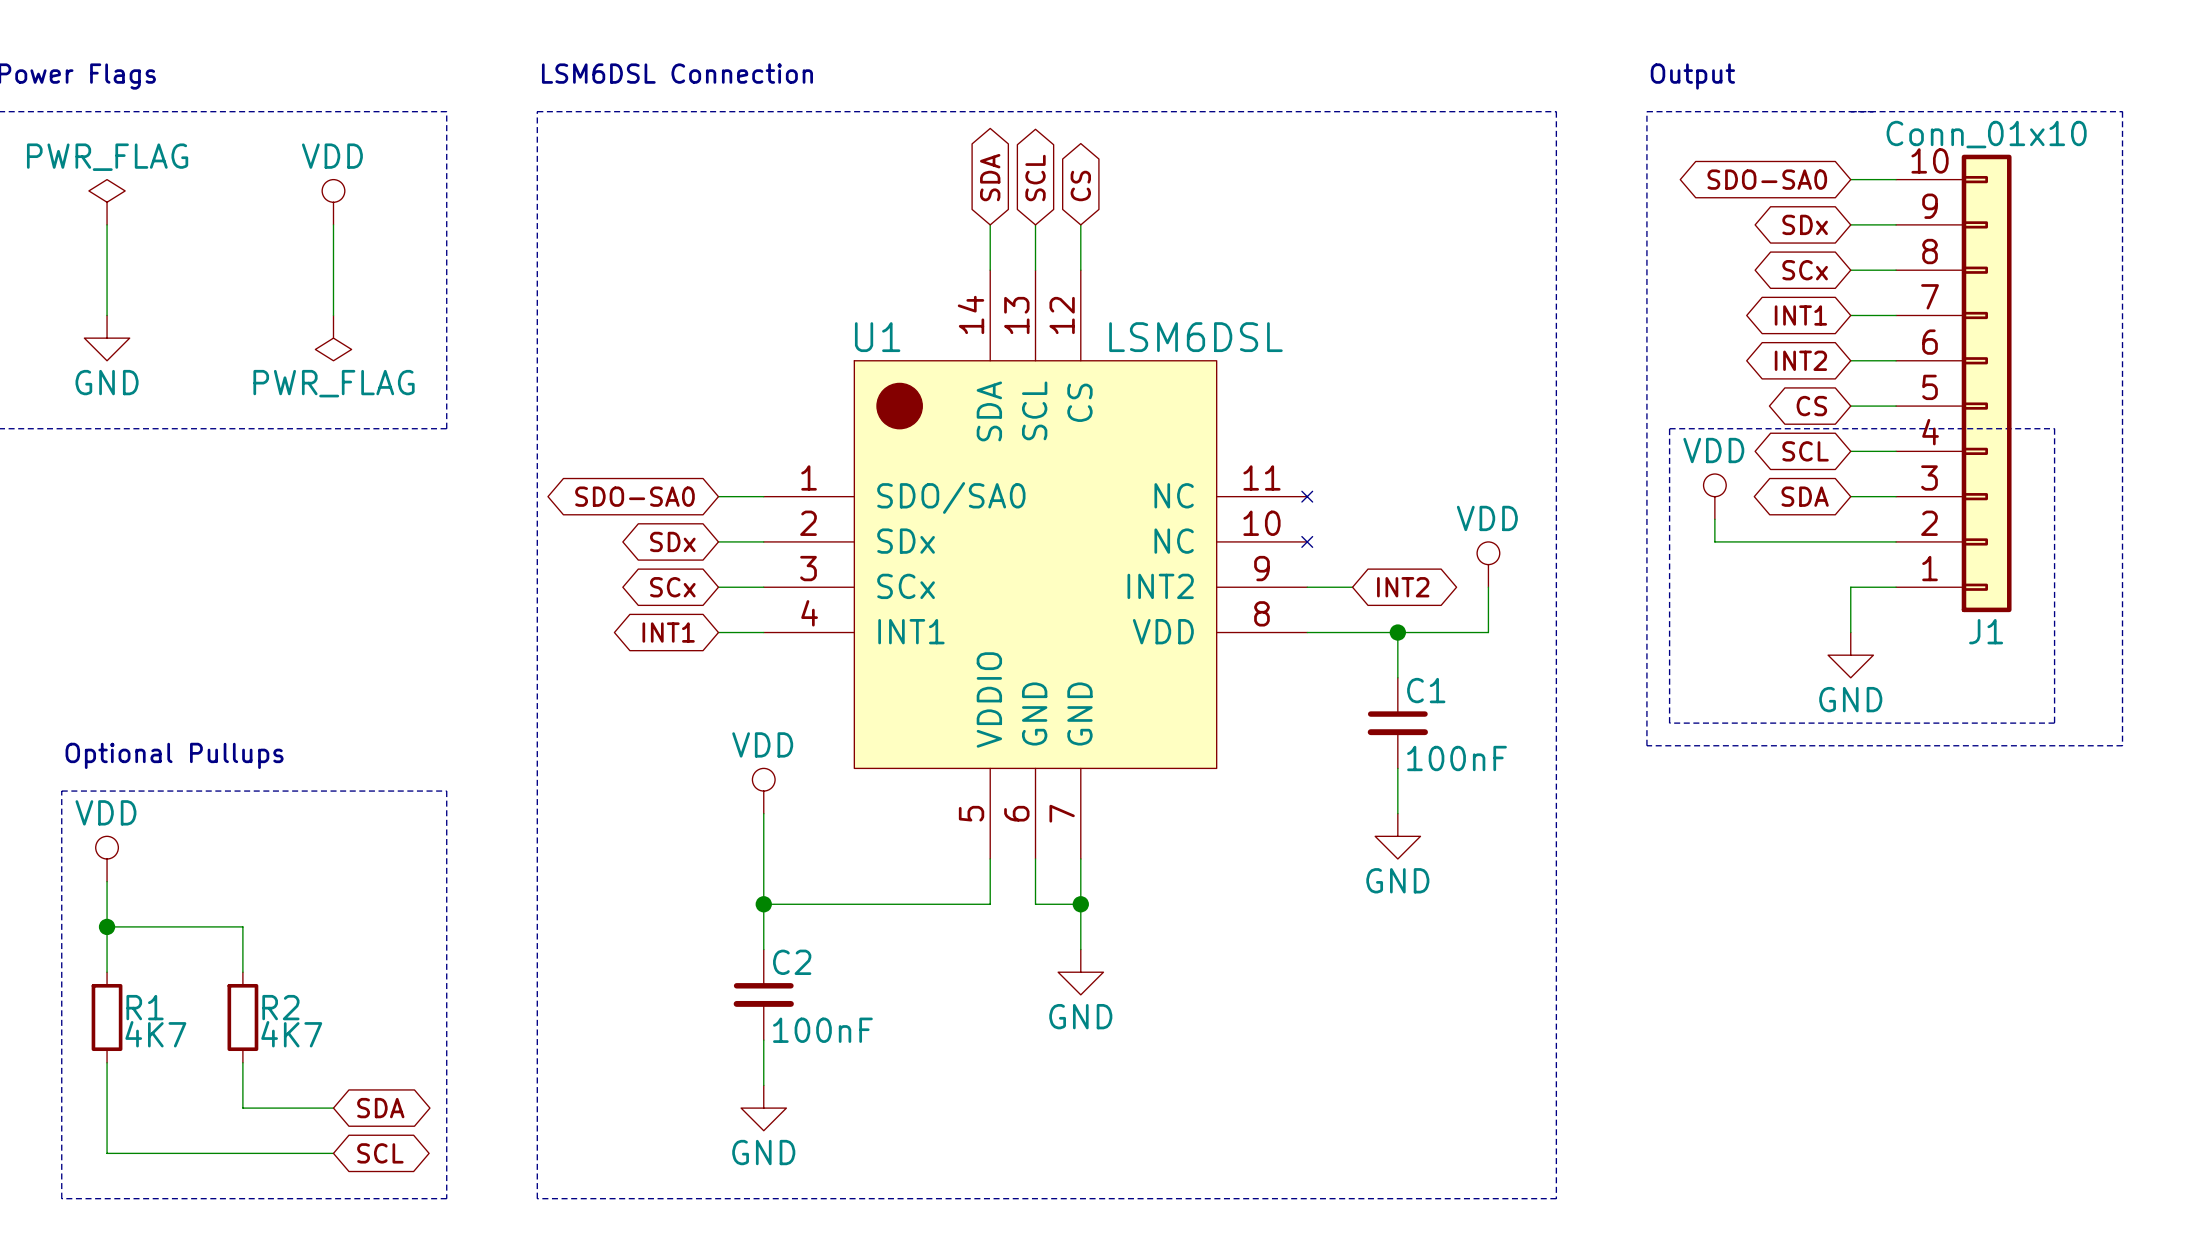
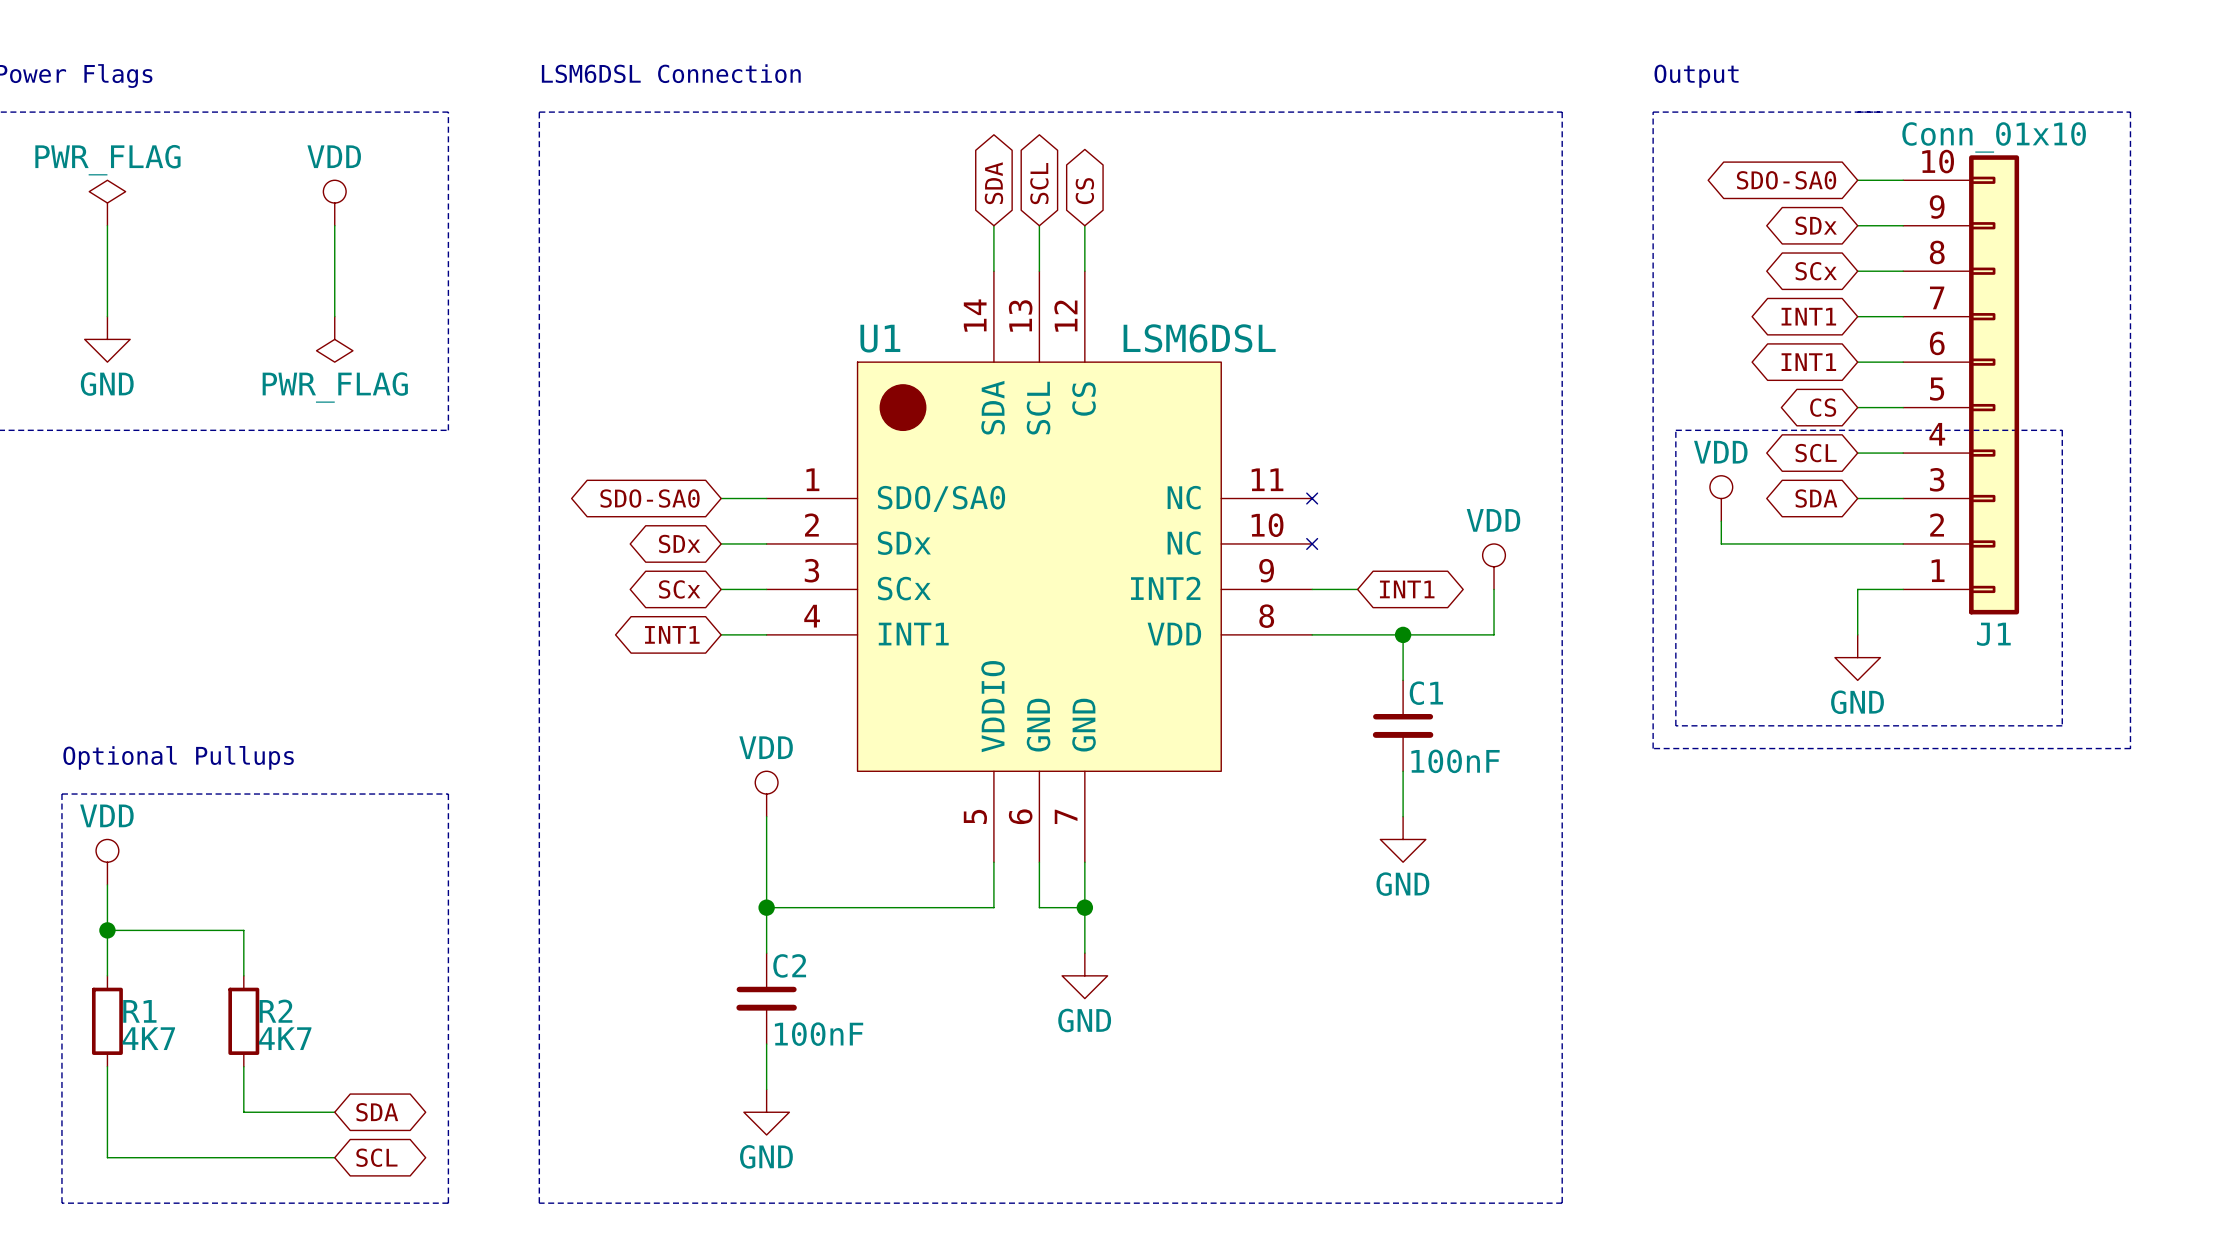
global label: INT2 (1800, 360) -> INT1 (1808, 362)
global label: INT2 (1403, 587) -> INT1 (1407, 589)

